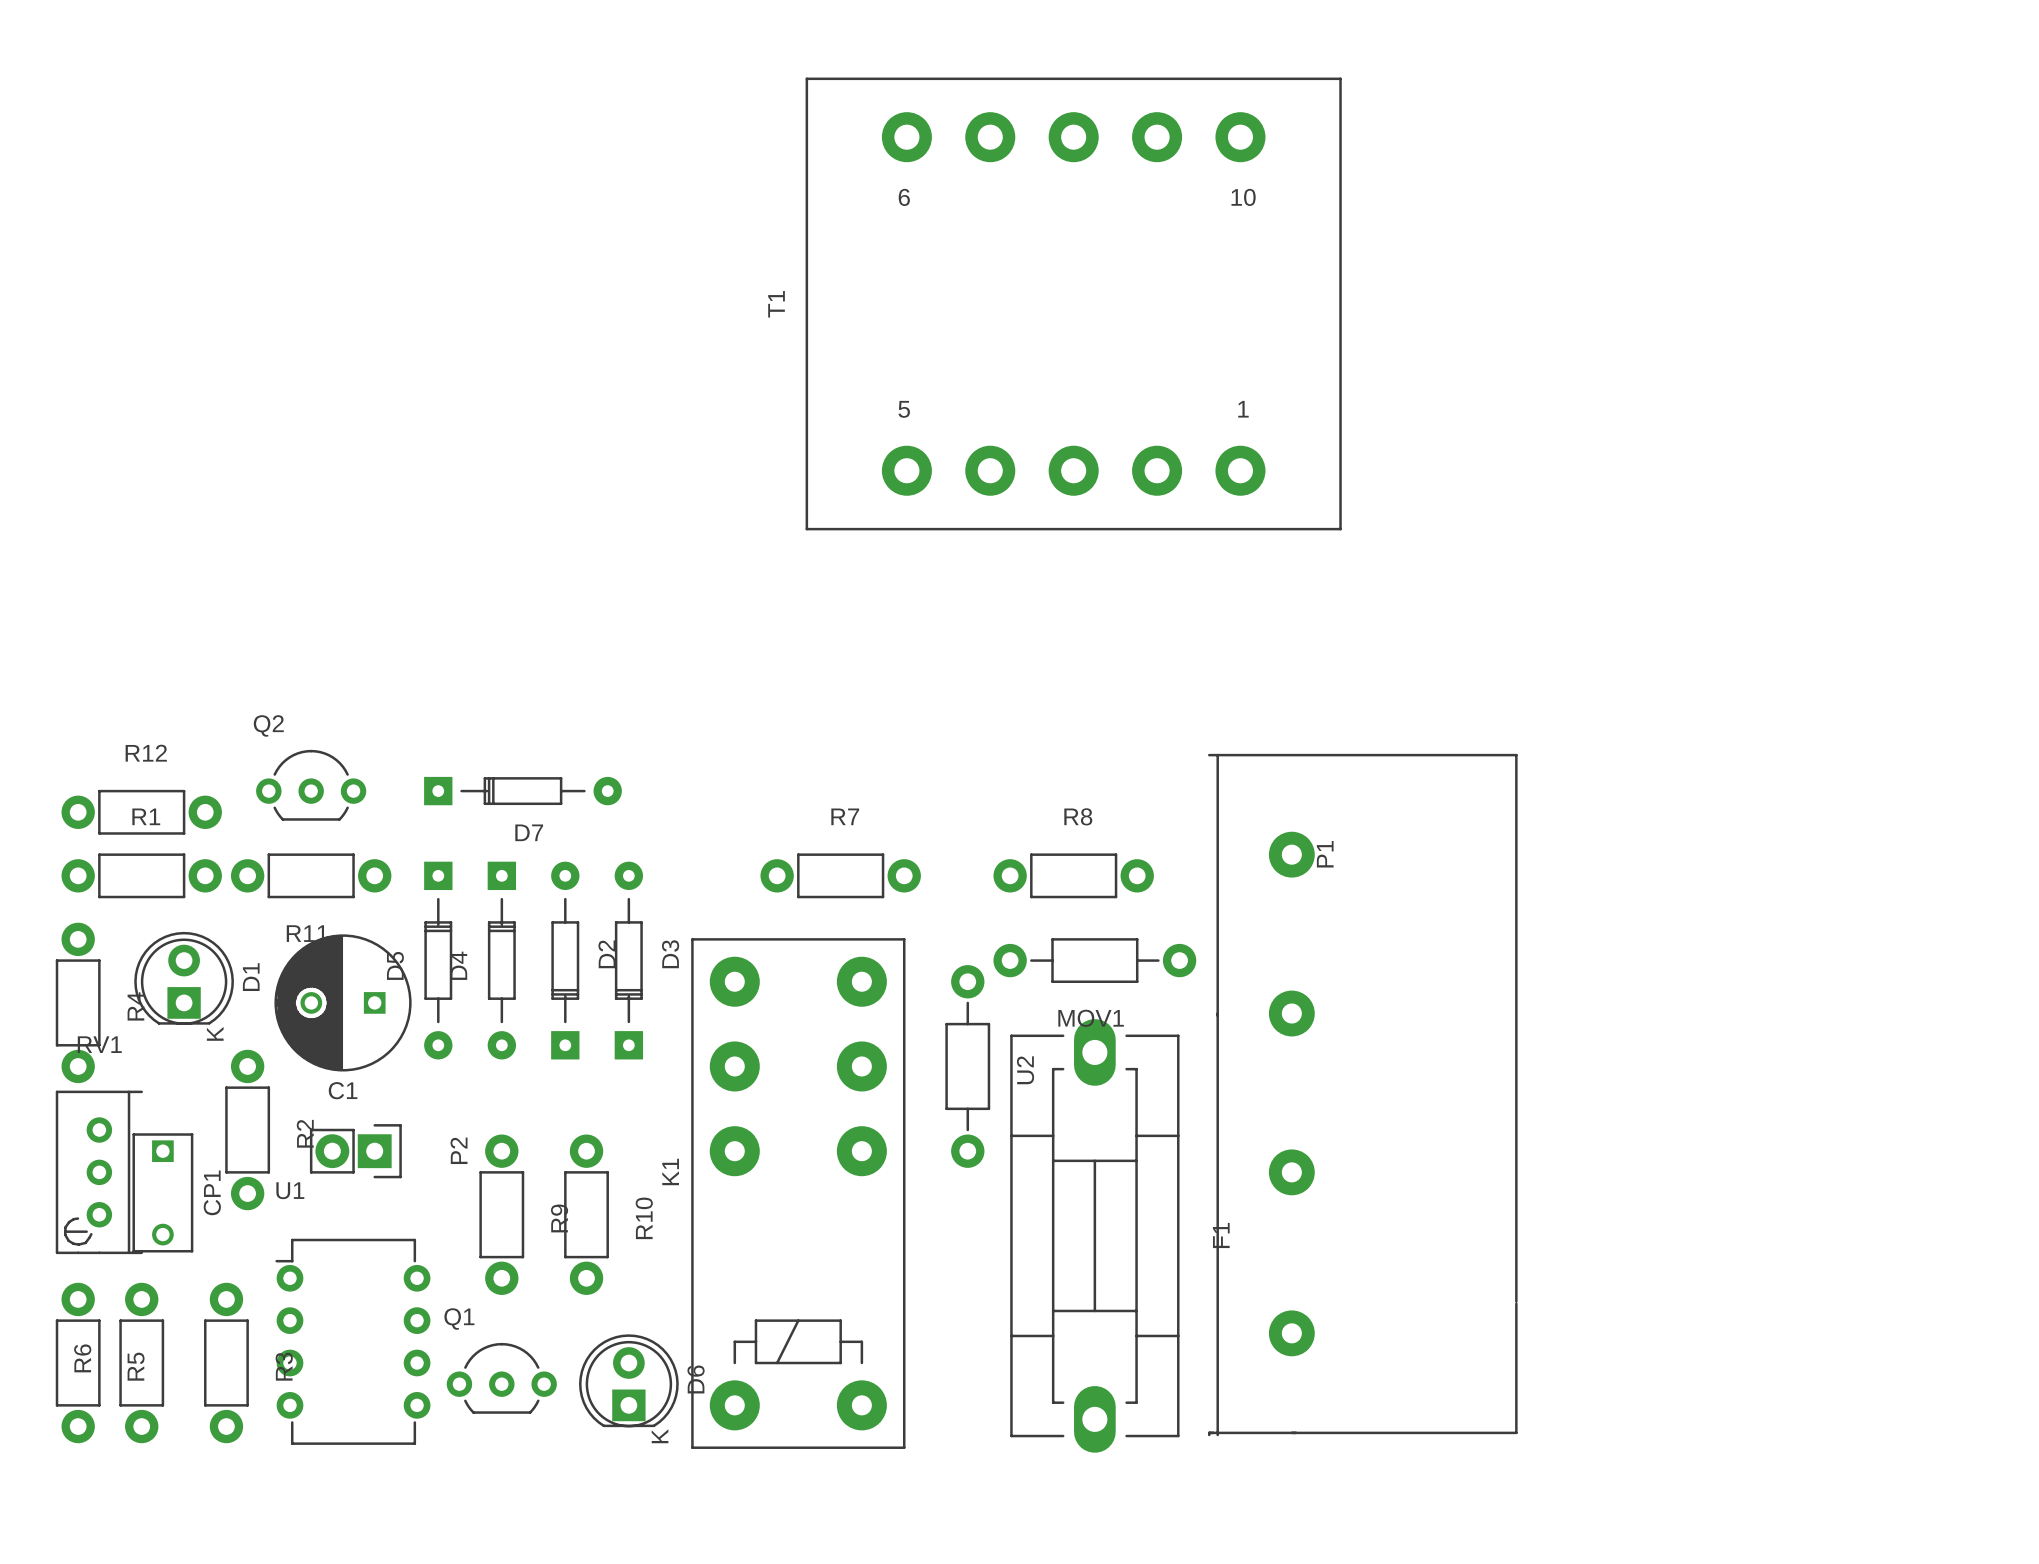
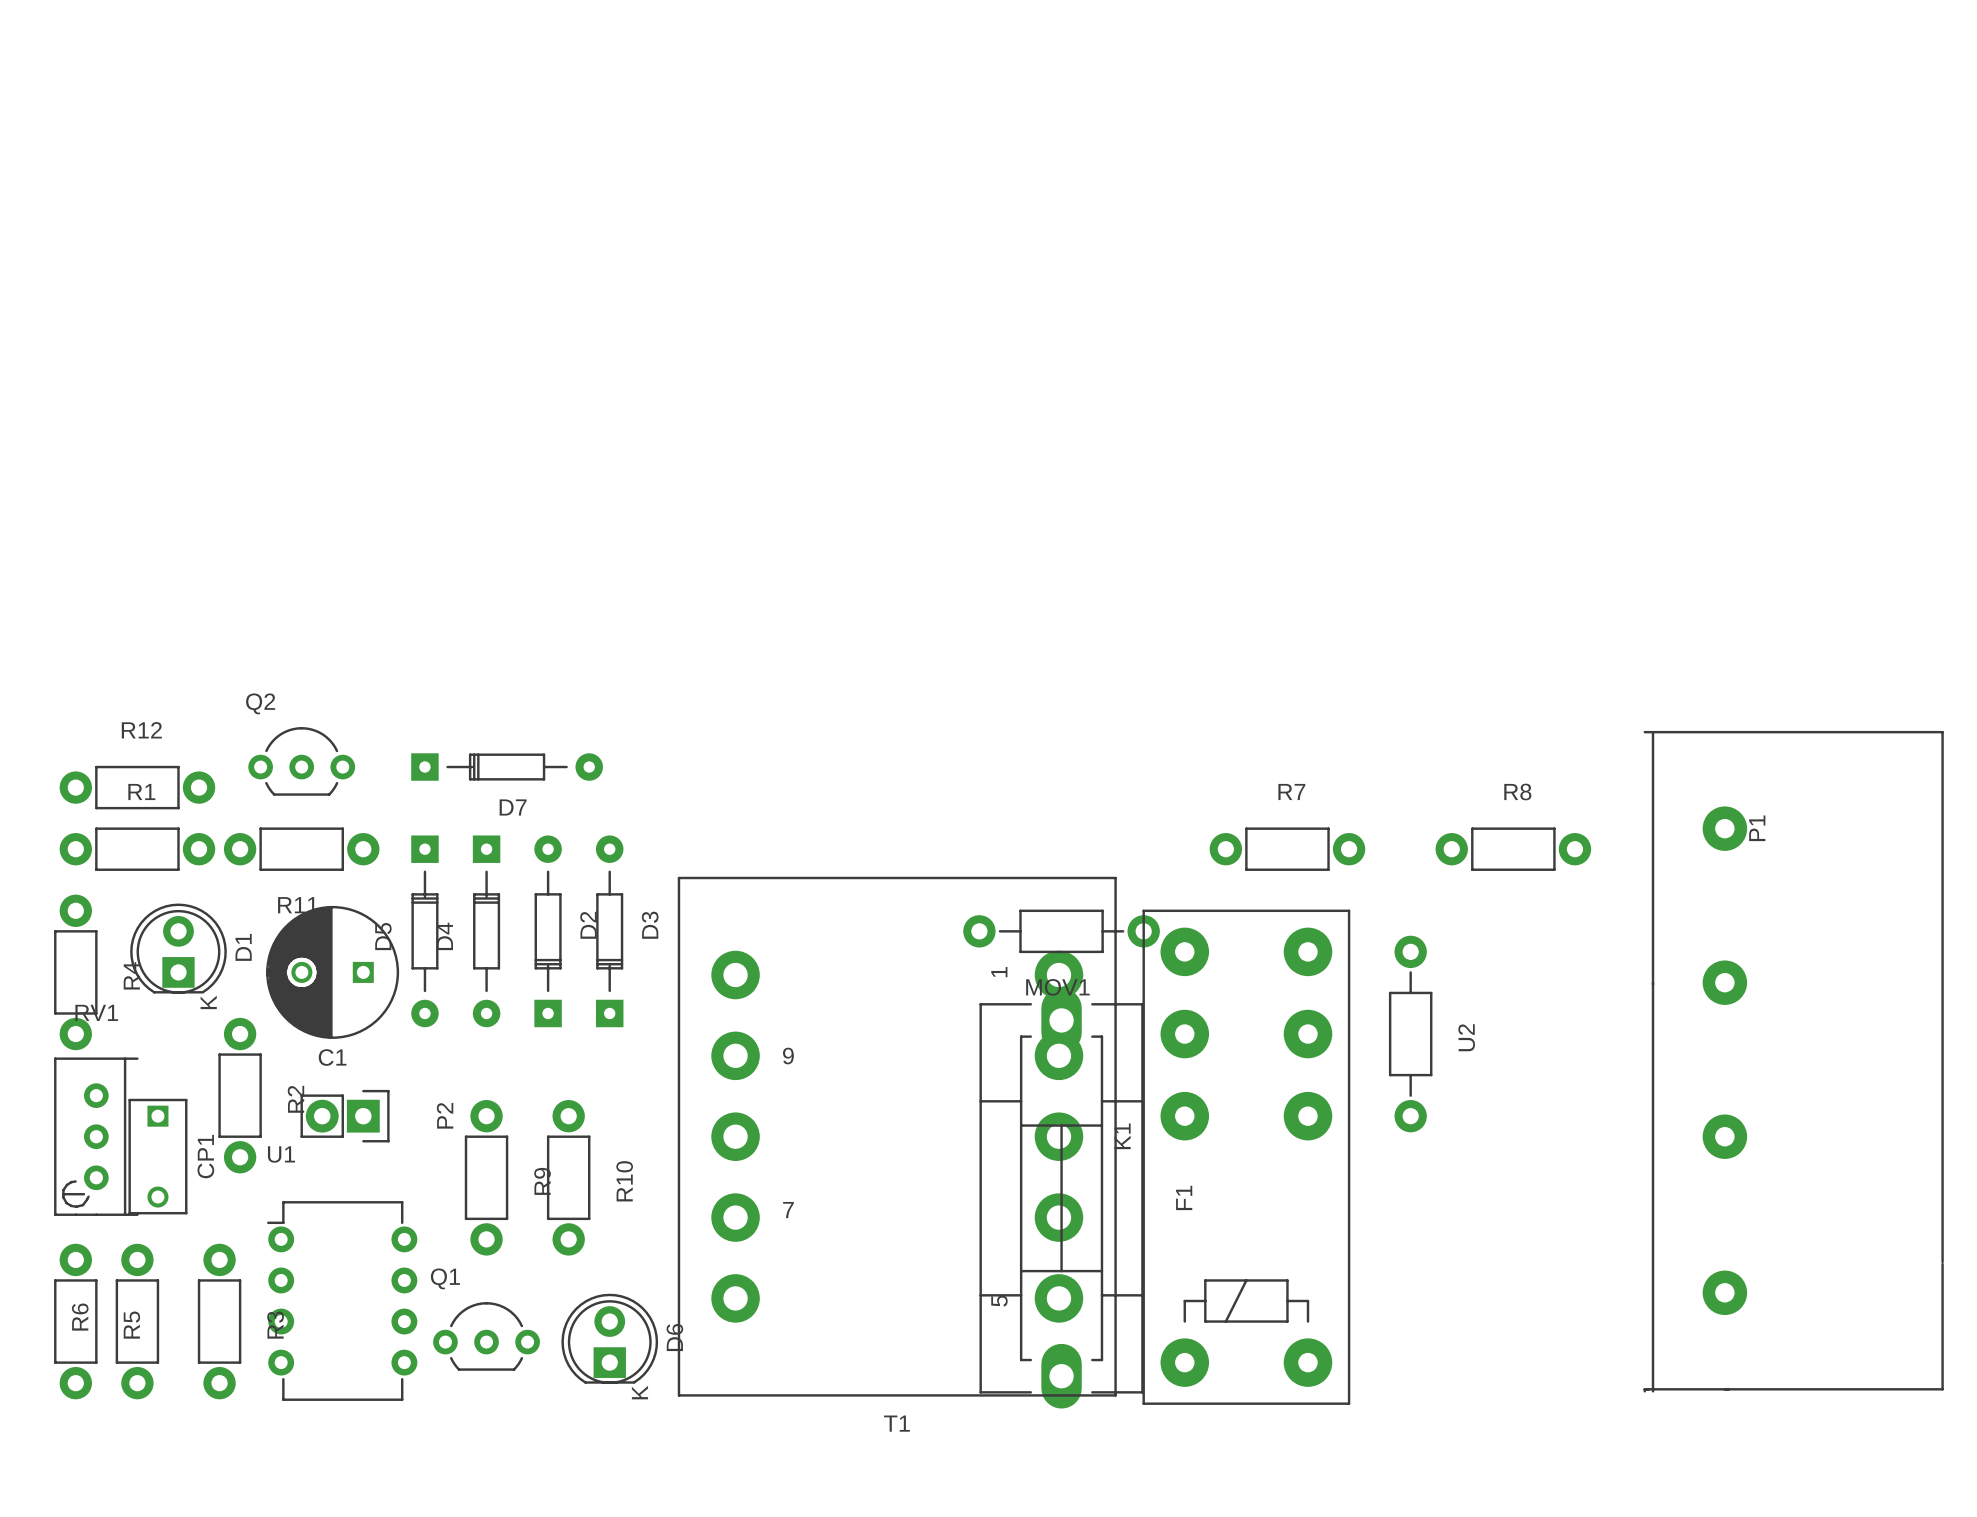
T1 footprint: [805, 77, 1342, 531] -> [677, 876, 1117, 1397]
T1 name position: T1 (776, 304) -> T1 (896, 1423)
R7 position: (840, 875) -> (1287, 849)
R8 position: (1073, 875) -> (1513, 849)
U2 position: (967, 1066) -> (1410, 1034)
P1 position: (1362, 1095) -> (1793, 1061)
K1 position: (798, 1193) -> (1246, 1157)

